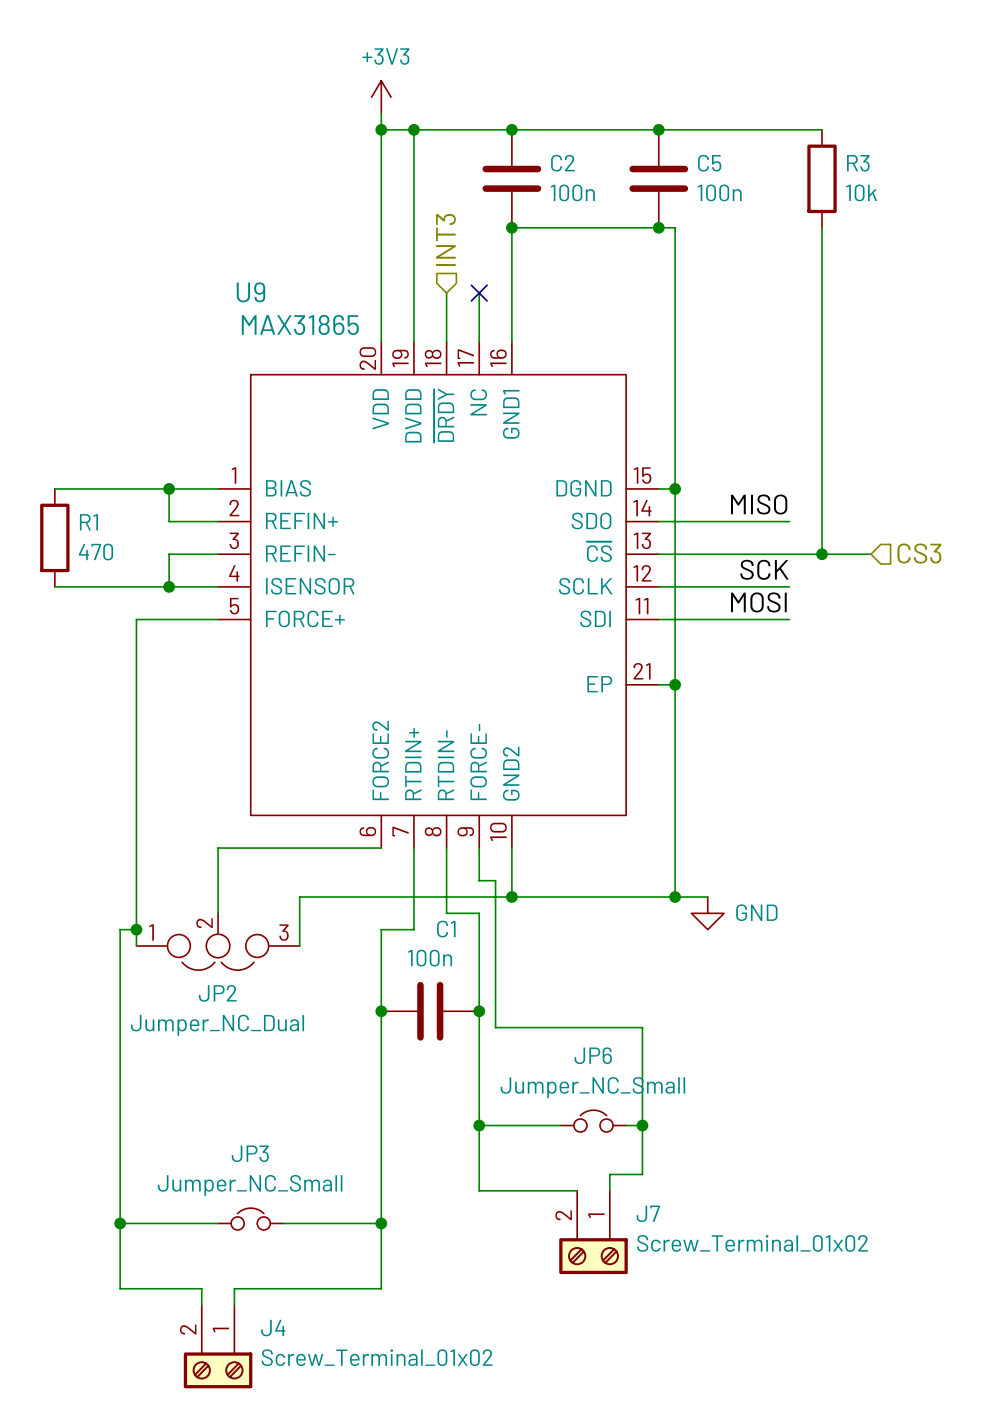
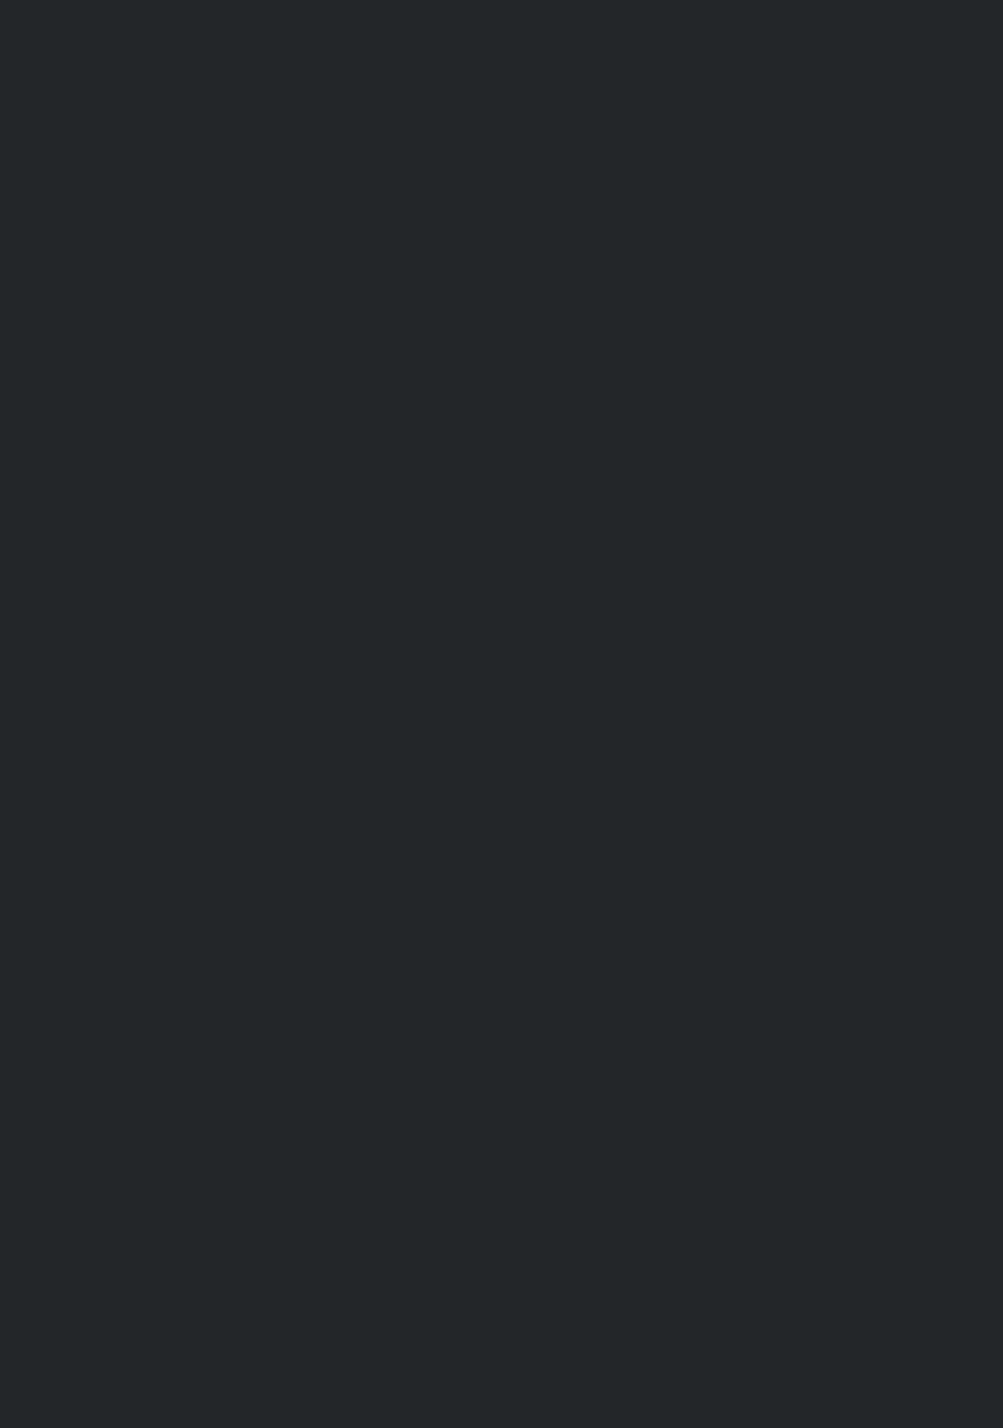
power symbol: +3V3 (381, 97) -> none
wire: (381, 113) (381, 342) -> none
wire: (381, 129) (822, 129) -> none
junction: (381, 129) -> none
wire: (413, 129) (413, 342) -> none
junction: (413, 129) -> none
junction: (511, 129) -> none
junction: (658, 129) -> none
C2: 100n (511, 178) -> none
C5: 100n (658, 178) -> none
R3: 10k (822, 178) -> none
junction: (511, 227) -> none
junction: (658, 227) -> none
wire: (822, 227) (822, 554) -> none
hierarchical label: INT3 (445, 239) -> none
wire: (446, 293) (446, 342) -> none
wire: (479, 293) (479, 342) -> none
no-connect mark: (479, 293) -> none
wire: (511, 342) (511, 227) (675, 227) (675, 897) -> none
wire: (54, 488) (218, 488) -> none
wire: (169, 488) (169, 521) (218, 521) -> none
junction: (169, 488) -> none
wire: (658, 488) (675, 488) -> none
junction: (675, 488) -> none
label: MISO (759, 504) -> none
wire: (658, 521) (789, 521) -> none
R1: 470 (54, 537) -> none
hierarchical label: CS3 (919, 553) -> none
wire: (218, 554) (169, 554) (169, 586) -> none
wire: (658, 554) (870, 554) -> none
junction: (822, 554) -> none
label: SCK (764, 569) -> none
wire: (54, 586) (218, 586) -> none
junction: (169, 586) -> none
wire: (658, 586) (789, 586) -> none
U9: MAX31865 (438, 595) -> none
label: MOSI (758, 602) -> none
wire: (218, 619) (136, 619) (136, 945) -> none
wire: (658, 619) (789, 619) -> none
wire: (658, 684) (675, 684) -> none
junction: (675, 684) -> none
wire: (381, 848) (218, 848) (218, 913) -> none
wire: (413, 848) (413, 929) (381, 929) (381, 1288) (234, 1288) (234, 1305) -> none
wire: (446, 848) (446, 913) (479, 913) (479, 1190) (577, 1190) -> none
wire: (479, 848) (479, 880) (495, 880) (495, 1027) (642, 1027) (642, 1174) (609, 1174) (609, 1190) -> none
wire: (511, 848) (511, 897) -> none
junction: (511, 897) -> none
junction: (675, 897) -> none
wire: (707, 897) (299, 897) (299, 945) -> none
power symbol: GND (707, 913) -> none
wire: (136, 929) (120, 929) (120, 1288) (201, 1288) (201, 1305) -> none
junction: (136, 929) -> none
JP2: Jumper_NC_Dual (218, 941) -> none
junction: (381, 1011) -> none
C1: 100n (430, 1011) -> none
junction: (479, 1011) -> none
JP6: Jumper_NC_Small (593, 1121) -> none
wire: (479, 1125) (560, 1125) -> none
junction: (479, 1125) -> none
wire: (626, 1125) (642, 1125) -> none
junction: (642, 1125) -> none
JP3: Jumper_NC_Small (250, 1219) -> none
wire: (120, 1223) (218, 1223) -> none
junction: (120, 1223) -> none
wire: (283, 1223) (381, 1223) -> none
junction: (381, 1223) -> none
J7: Screw_Terminal_01x02 (593, 1232) -> none
J4: Screw_Terminal_01x02 (218, 1346) -> none

